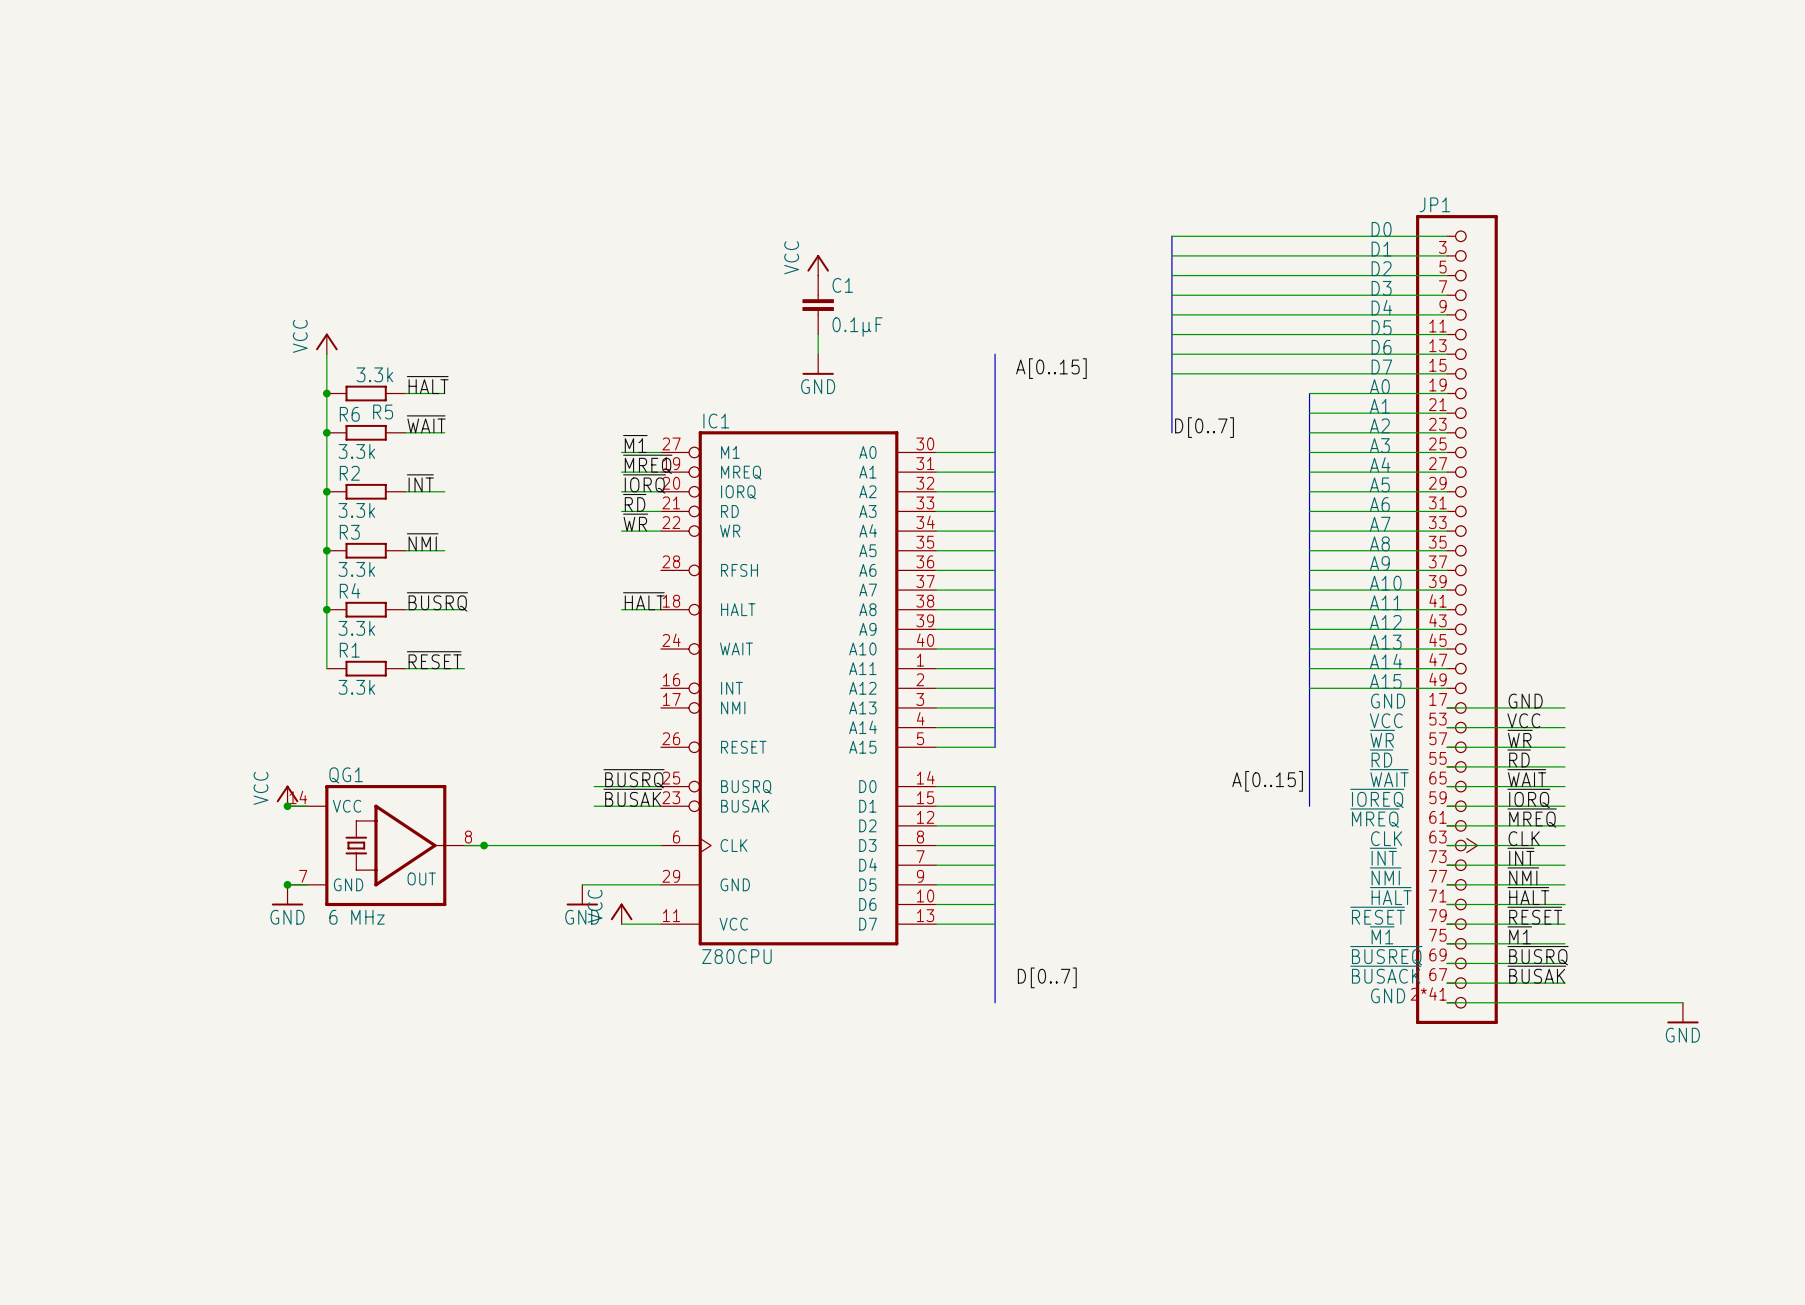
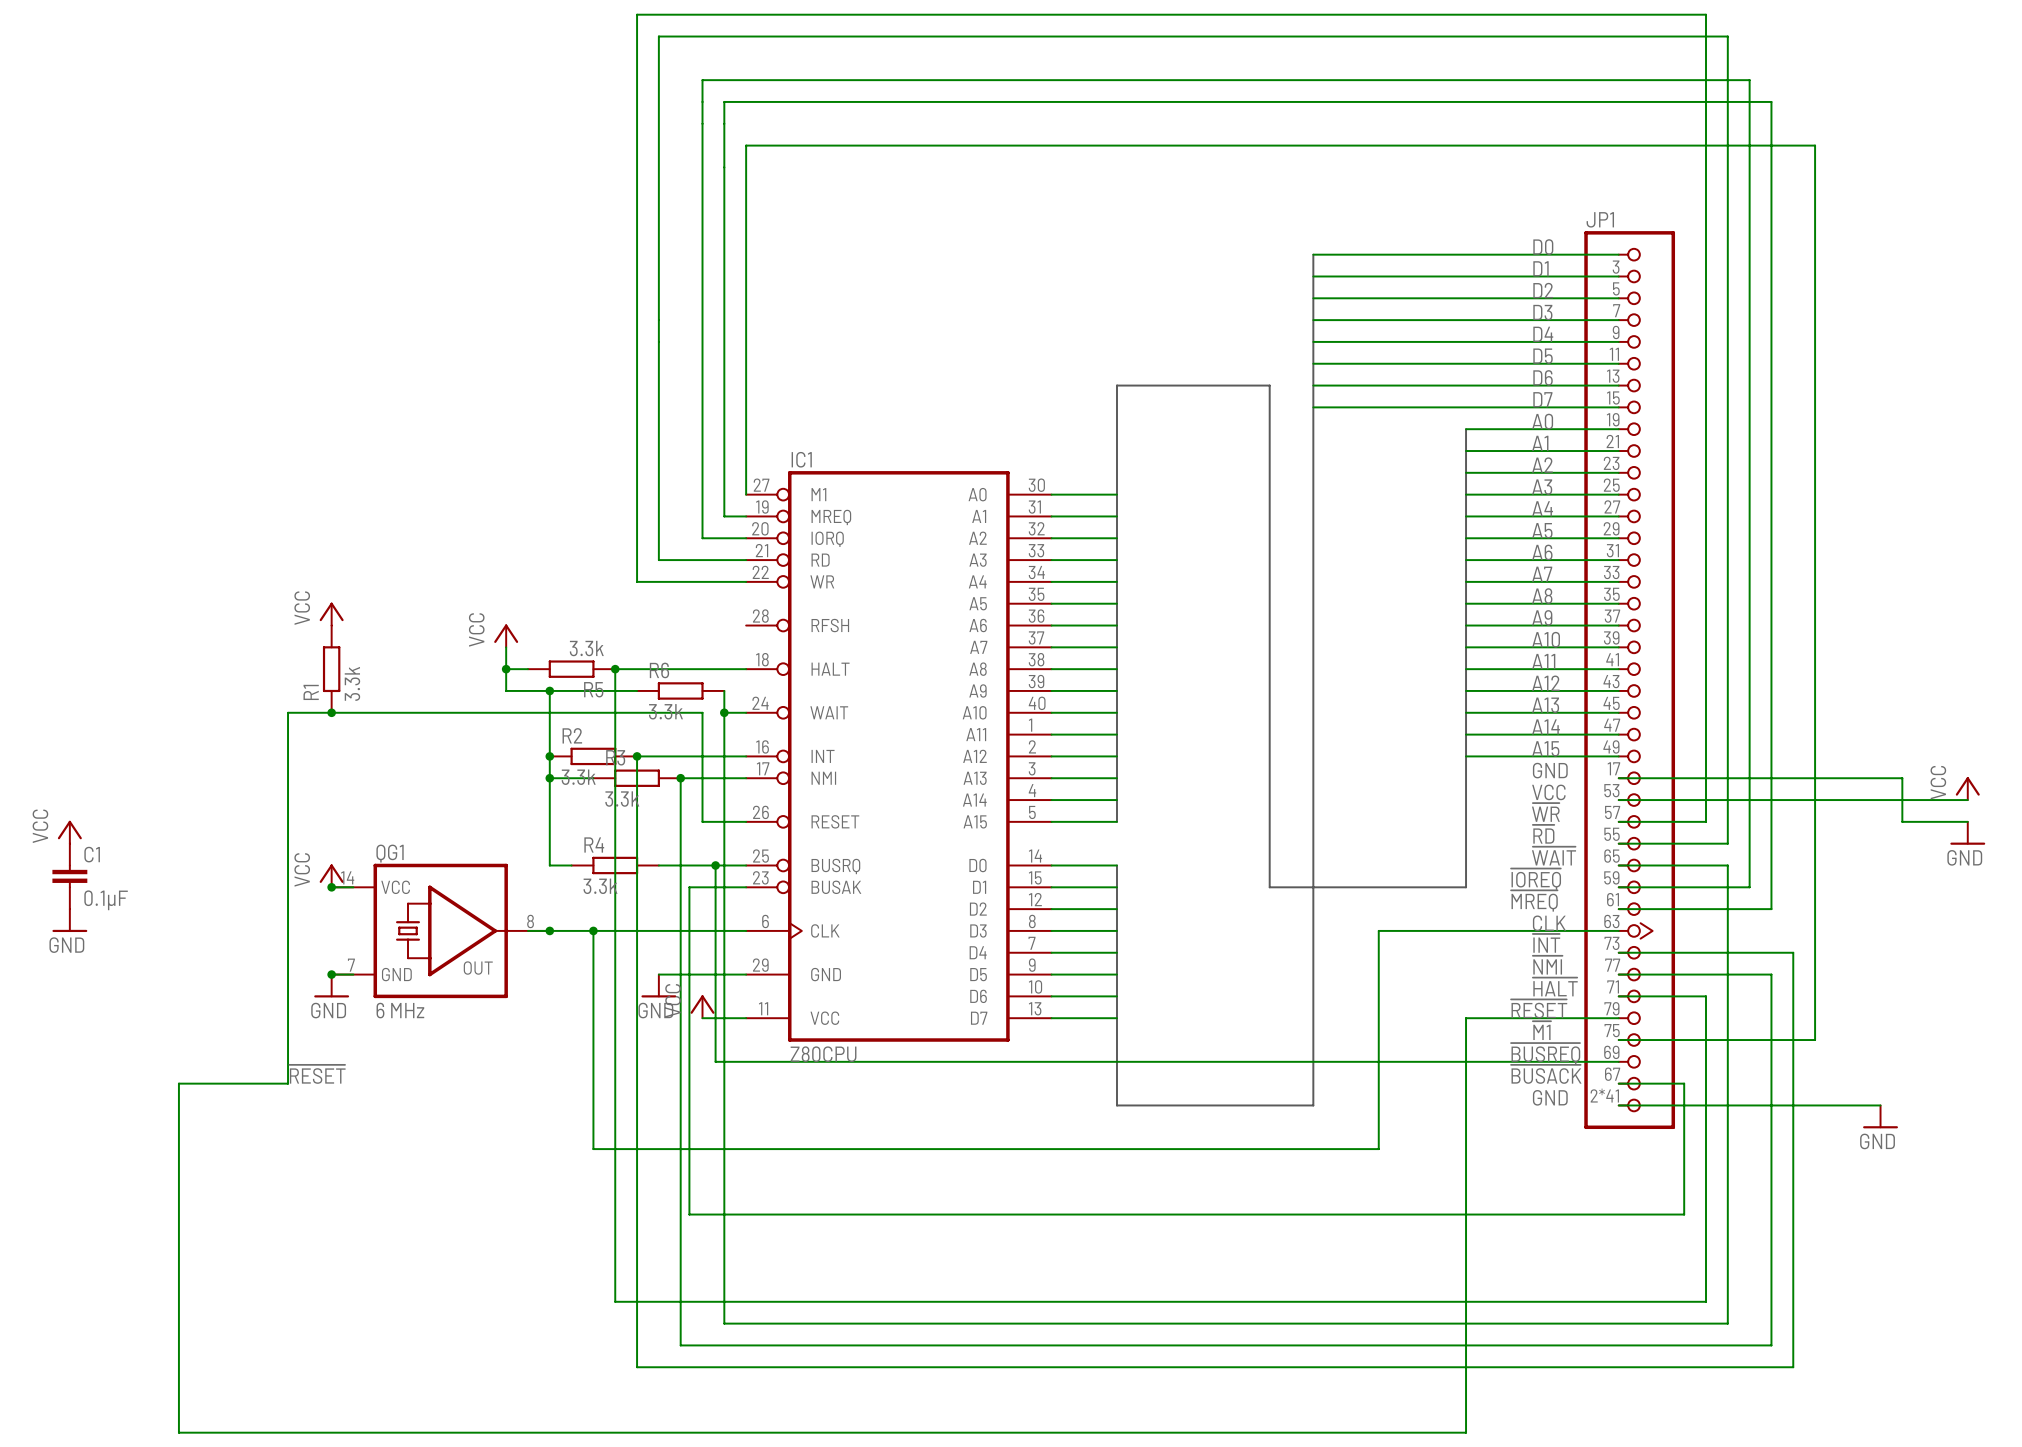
power symbol: VCC (818, 265) -> none
C1 position: (818, 305) -> (69, 876)
wire: (818, 334) (818, 354) -> none
power symbol: VCC (326, 343) -> none
wire: (326, 354) (326, 668) -> none
bus: none -> (1116, 385) (1269, 385) (1269, 887) (1466, 887)
power symbol: GND (818, 364) -> none
label: A[0..15] (1051, 368) -> none
label: ~{HALT} (427, 385) -> none
junction: (326, 393) -> none
R5 position: (366, 393) -> (571, 669)
wire: (405, 393) (444, 393) -> none
label: ~{WAIT} (426, 424) -> none
label: D[0..7] (1204, 427) -> none
junction: (326, 432) -> none
R6 position: (366, 432) -> (680, 690)
wire: (405, 432) (444, 432) -> none
bus: none -> (1313, 472) (1313, 1105) (1116, 1105)
label: ~{M1} (635, 444) -> none
wire: (621, 452) (660, 452) -> (1749, 1040) (1815, 1040) (1815, 145) (746, 145) (746, 494)
label: ~{MREQ} (647, 464) -> none
wire: (621, 472) (641, 472) -> (1749, 909) (1771, 909) (1771, 101) (724, 101) (724, 516)
label: ~{INT} (420, 483) -> none
label: ~{IORQ} (644, 483) -> none
junction: (326, 491) -> none
R2 position: (366, 491) -> (593, 756)
wire: (405, 491) (444, 491) -> none
wire: none -> (702, 538) (702, 80) (1749, 80) (1749, 887)
label: ~{RD} (634, 502) -> none
label: ~{WR} (635, 522) -> none
label: ~{NMI} (422, 542) -> none
junction: (326, 550) -> none
R3 position: (366, 550) -> (637, 778)
wire: (405, 550) (444, 550) -> none
power symbol: none -> VCC (331, 614)
power symbol: none -> VCC (506, 635)
wire: none -> (506, 647) (506, 690) (637, 690)
label: ~{BUSRQ} (437, 601) -> none
label: ~{HALT} (643, 601) -> none
junction: (326, 609) -> none
R4 position: (366, 609) -> (615, 865)
wire: (405, 609) (444, 609) -> (549, 778) (593, 778)
junction: none -> (506, 669)
junction: none -> (615, 669)
wire: none -> (549, 690) (549, 865) (571, 865)
junction: none -> (549, 690)
junction: none -> (331, 712)
wire: none -> (724, 712) (746, 712)
junction: none -> (724, 712)
R1 name position: R1 (349, 650) -> R1 (311, 692)
label: ~{RESET} (434, 660) -> none
R1 rotation: 0° (366, 668) -> 90° clockwise (331, 669)
R1 position: (366, 668) -> (331, 669)
wire: (405, 668) (464, 668) -> none
R1 value position: 3.3k (356, 687) -> 3.3k (352, 683)
junction: none -> (549, 756)
junction: none -> (637, 756)
wire: none -> (746, 756) (637, 756) (637, 1367) (1793, 1367) (1793, 952) (1749, 952)
label: GND (1525, 701) -> none
junction: none -> (549, 778)
junction: none -> (680, 778)
wire: none -> (746, 778) (680, 778) (680, 1345) (1771, 1345) (1771, 974) (1749, 974)
wire: none -> (1749, 778) (1902, 778) (1902, 821) (1967, 821)
power symbol: none -> VCC (1967, 788)
label: VCC (1523, 720) -> none
wire: none -> (1749, 800) (1967, 800)
label: ~{WR} (1520, 738) -> none
wire: (1525, 747) (1565, 747) -> (1706, 821) (1706, 14) (637, 14) (637, 581) (702, 581)
power symbol: none -> VCC (69, 832)
power symbol: none -> GND (1967, 833)
label: ~{RD} (1519, 758) -> none
wire: (1545, 766) (1565, 766) -> (1727, 843) (1727, 36) (658, 36) (658, 560) (702, 560)
label: ~{BUSRQ} (633, 778) -> none
label: ~{WAIT} (1526, 778) -> none
label: A[0..15] (1267, 781) -> none
wire: none -> (658, 865) (671, 865)
junction: none -> (715, 865)
wire: (1545, 786) (1565, 786) -> (1727, 865) (1727, 1323) (724, 1323) (724, 690)
label: ~{BUSAK} (632, 797) -> none
label: ~{IORQ} (1528, 798) -> none
wire: (594, 806) (609, 806) -> (1684, 1083) (1684, 1214) (689, 1214) (689, 887)
label: ~{MREQ} (1532, 818) -> none
power symbol: none -> GND (69, 920)
label: CLK (1524, 838) -> none
junction: none -> (593, 930)
wire: (1447, 845) (1565, 845) -> (1618, 930) (1378, 930) (1378, 1149) (593, 1149) (593, 930)
label: ~{INT} (1520, 856) -> none
label: ~{NMI} (1523, 876) -> none
label: ~{HALT} (1528, 896) -> none
wire: (1525, 904) (1565, 904) -> (1706, 996) (1706, 1301) (615, 1301) (615, 669) (702, 669)
label: ~{RESET} (1534, 915) -> none
wire: (1447, 924) (1565, 924) -> (1618, 1018) (1466, 1018) (1466, 1432) (178, 1432) (178, 1083) (288, 1083) (288, 712) (702, 712) (702, 821) (746, 821)
label: ~{M1} (1519, 935) -> none
label: ~{BUSRQ} (1538, 955) -> none
wire: (1447, 963) (1565, 963) -> (1618, 1061) (715, 1061) (715, 865)
label: none -> ~{RESET} (317, 1074)
label: ~{BUSAK} (1536, 974) -> none
label: D[0..7] (1047, 977) -> none
wire: (1506, 983) (1565, 983) -> none

